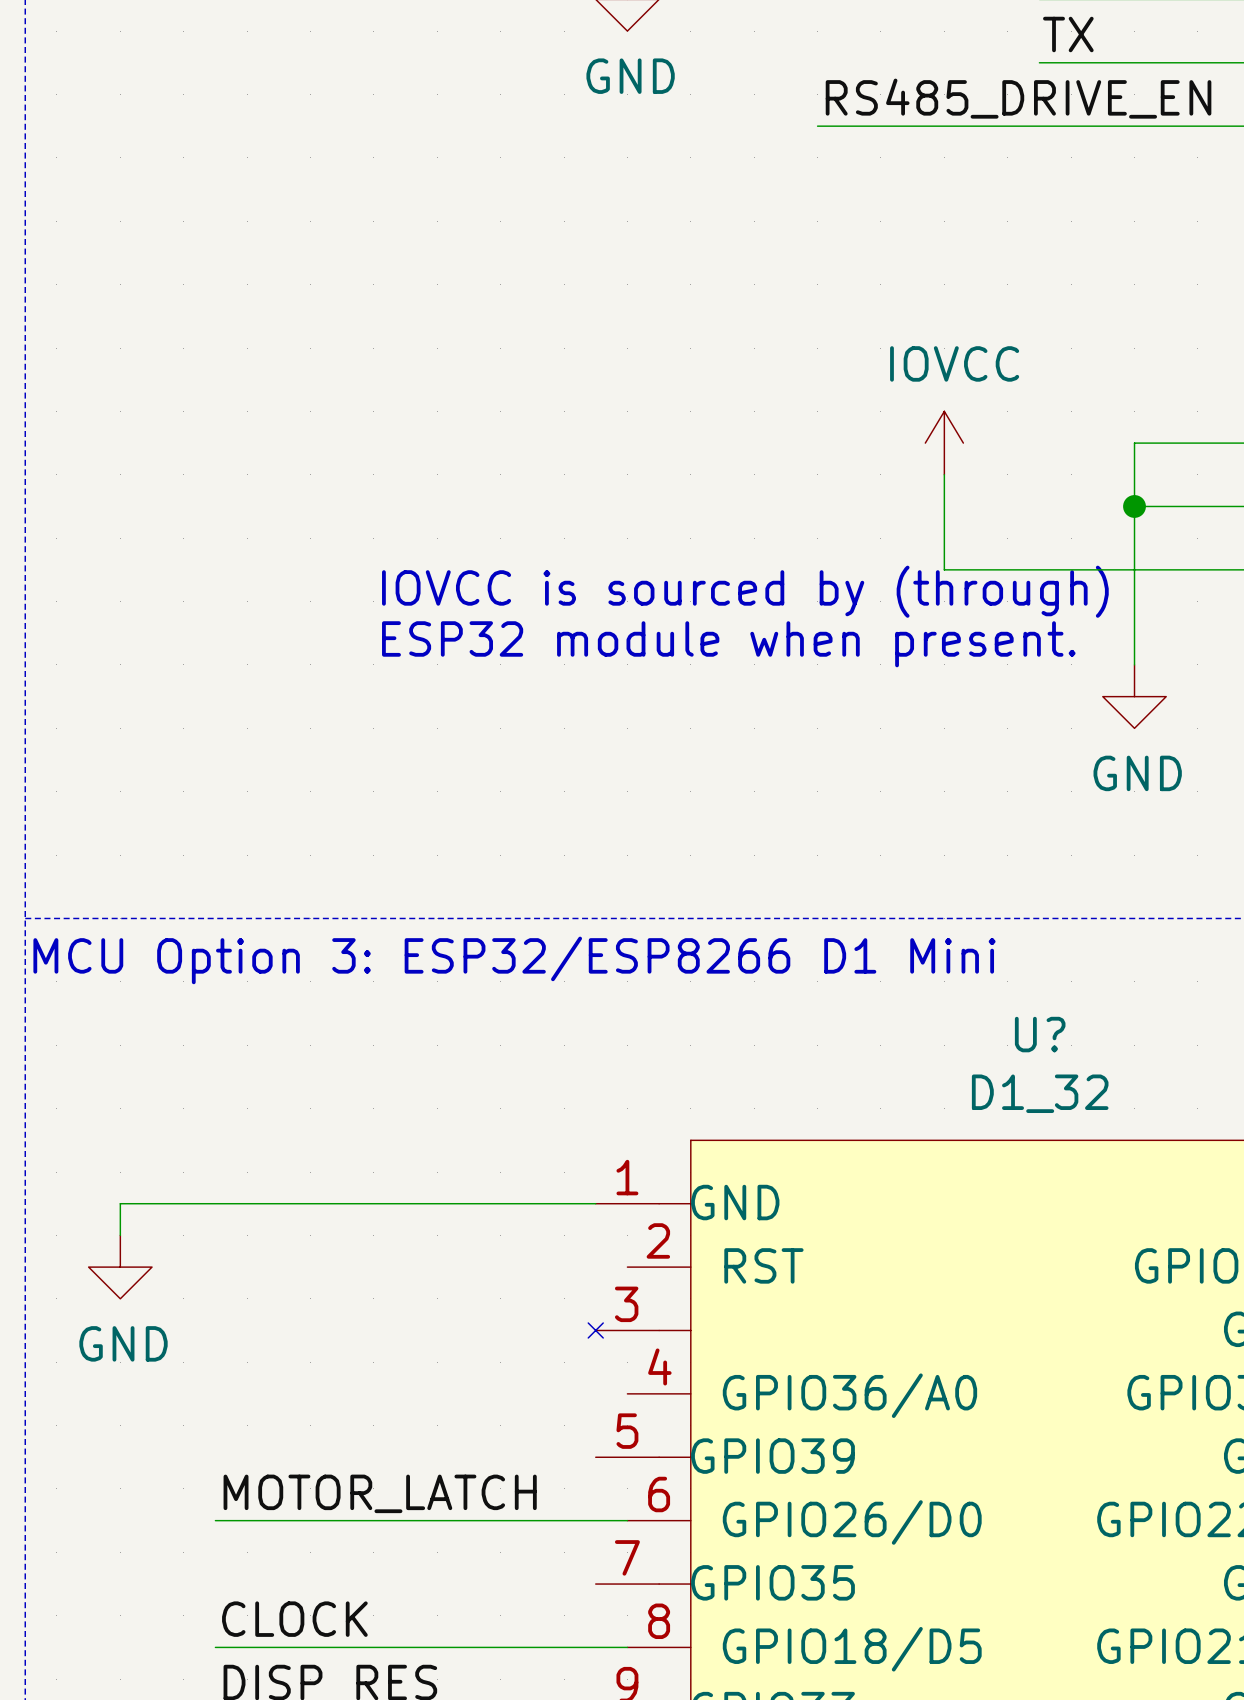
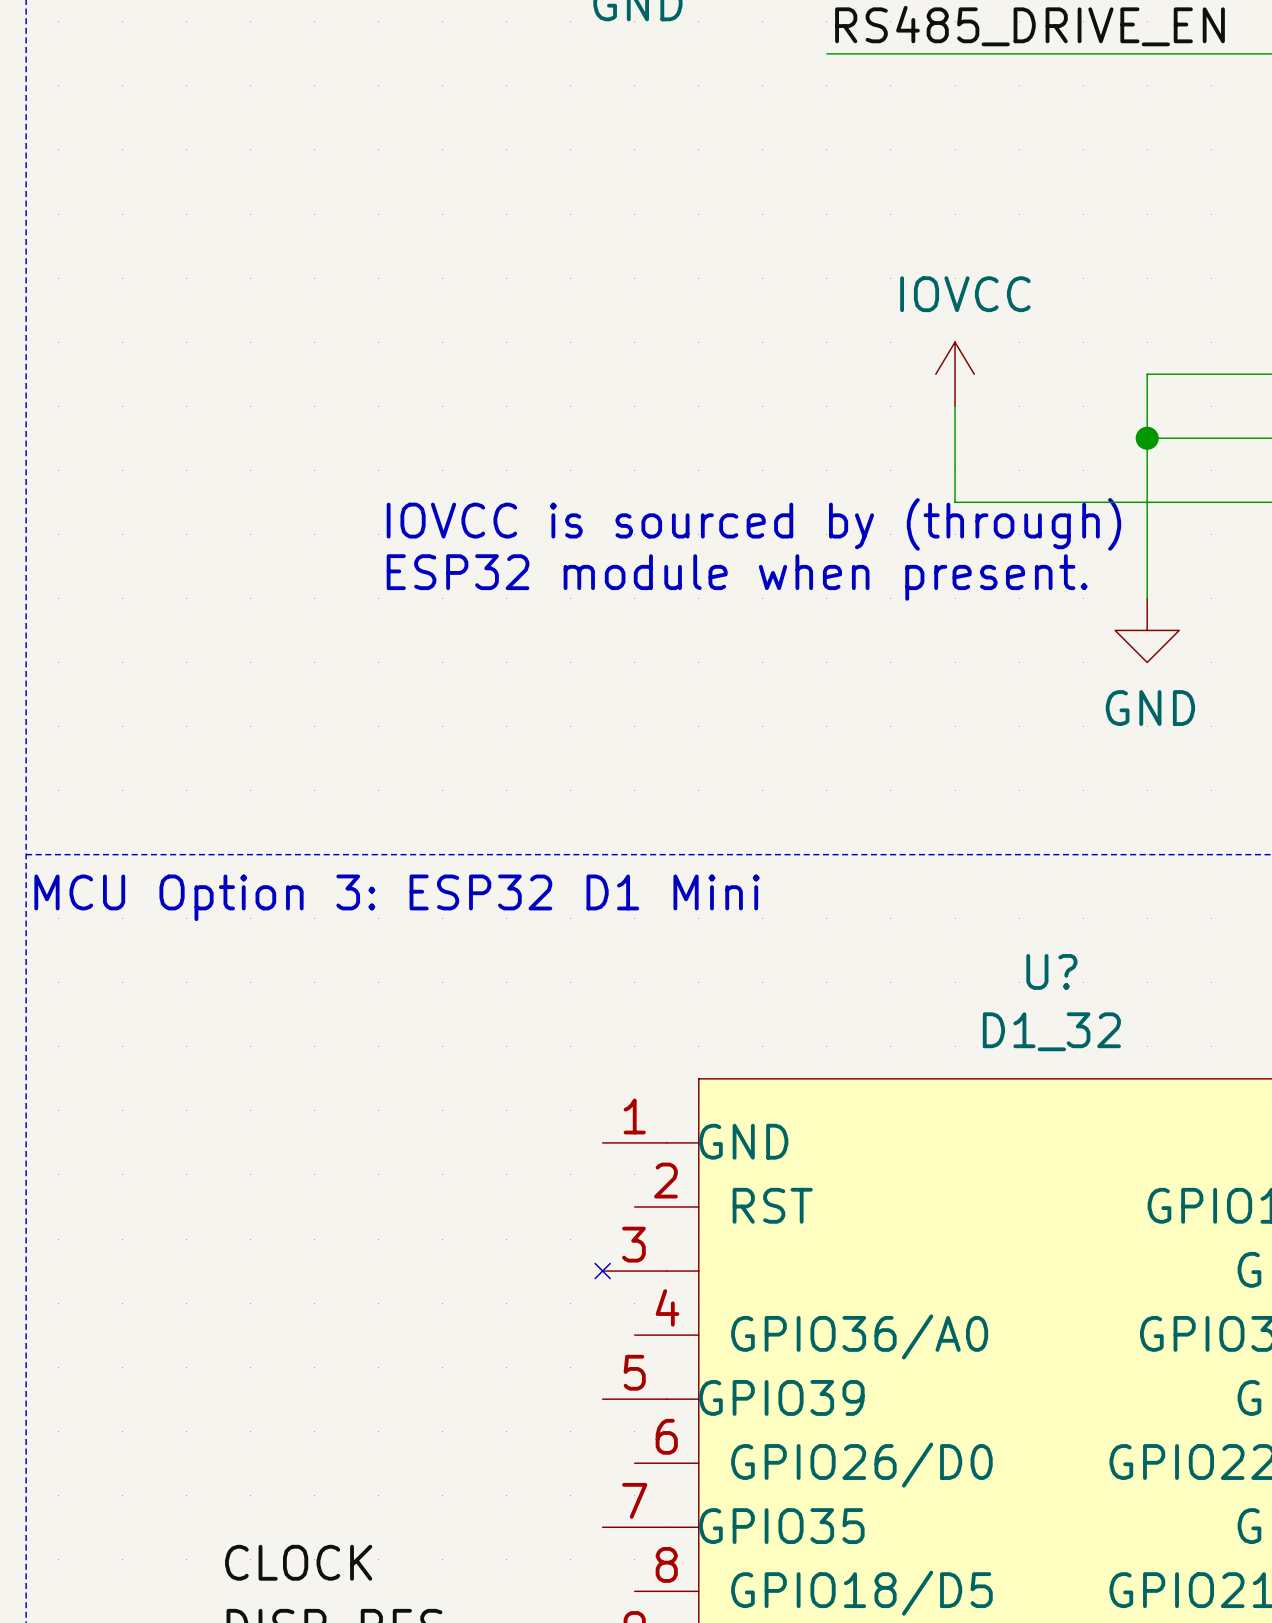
text: MCU Option 3: ESP32/ESP8266 D1 Mini (514, 960) -> MCU Option 3: ESP32 D1 Mini (397, 897)
wire: (595, 1203) (120, 1203) (120, 1235) -> none
power symbol: GND (120, 1267) -> none
label: MOTOR_LATCH (380, 1493) -> none
wire: (215, 1520) (627, 1520) -> none
wire: (215, 1647) (627, 1647) -> none

